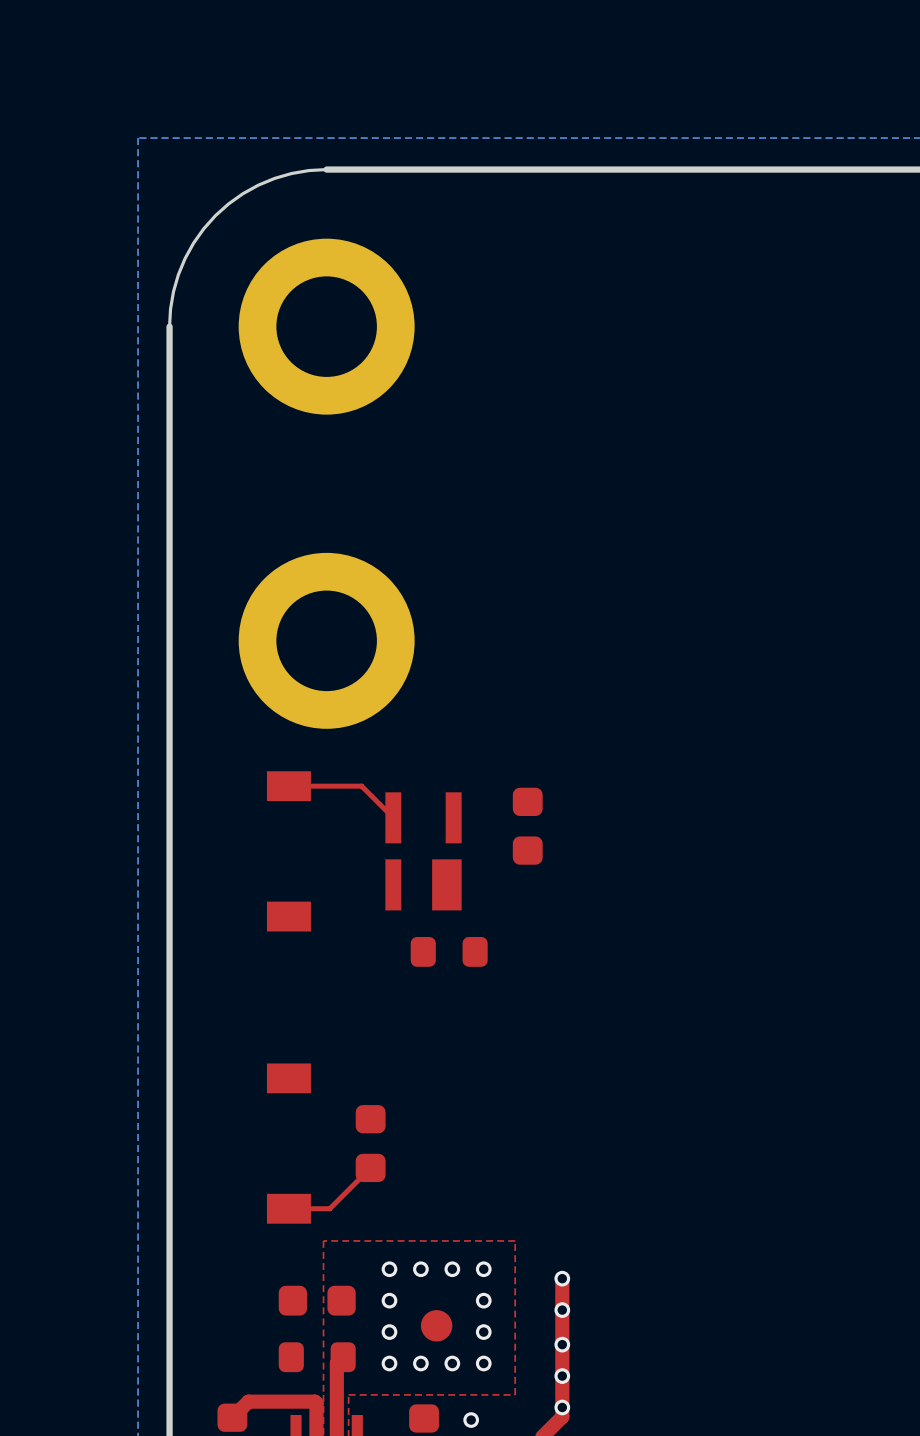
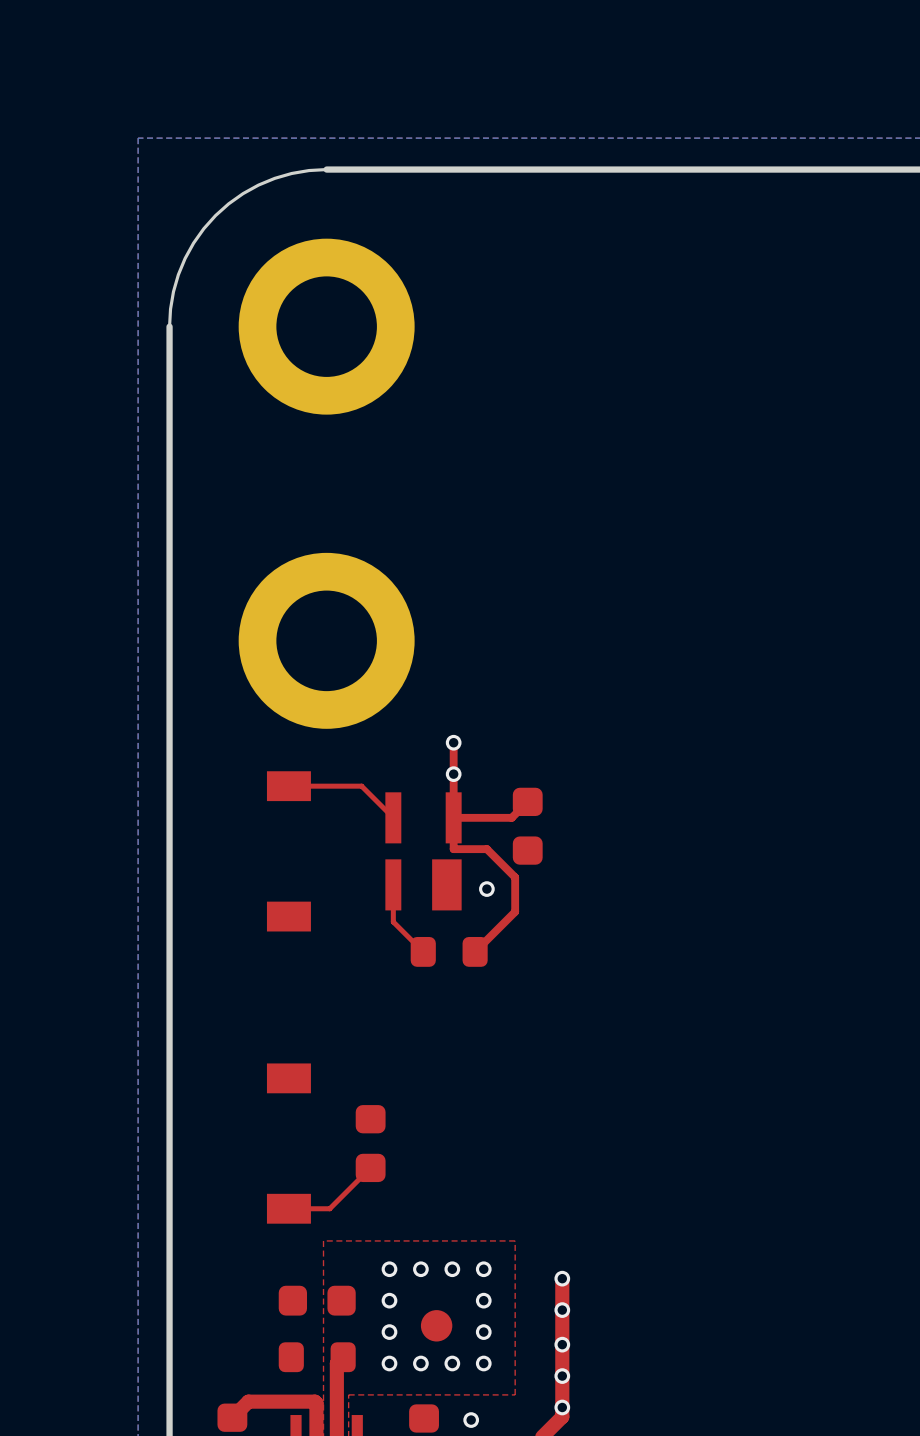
top track: none -> (453, 742) (453, 849) (486, 849) (515, 877) (515, 911) (475, 951)
via: none -> (453, 742)
via: none -> (453, 774)
top track: none -> (527, 801) (511, 817) (453, 817)
top track: none -> (393, 884) (393, 921) (423, 951)
via: none -> (486, 889)

